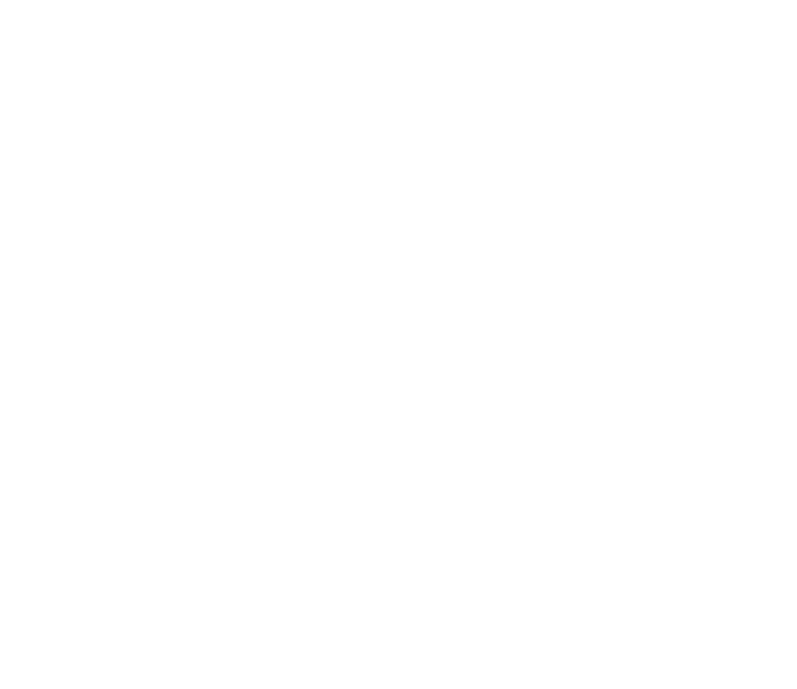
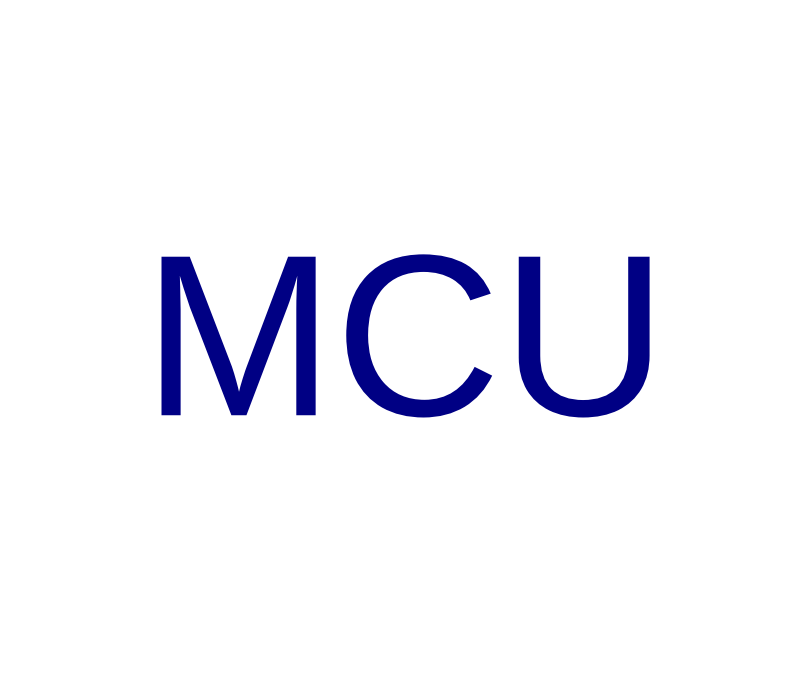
text: none -> MCU (405, 335)

